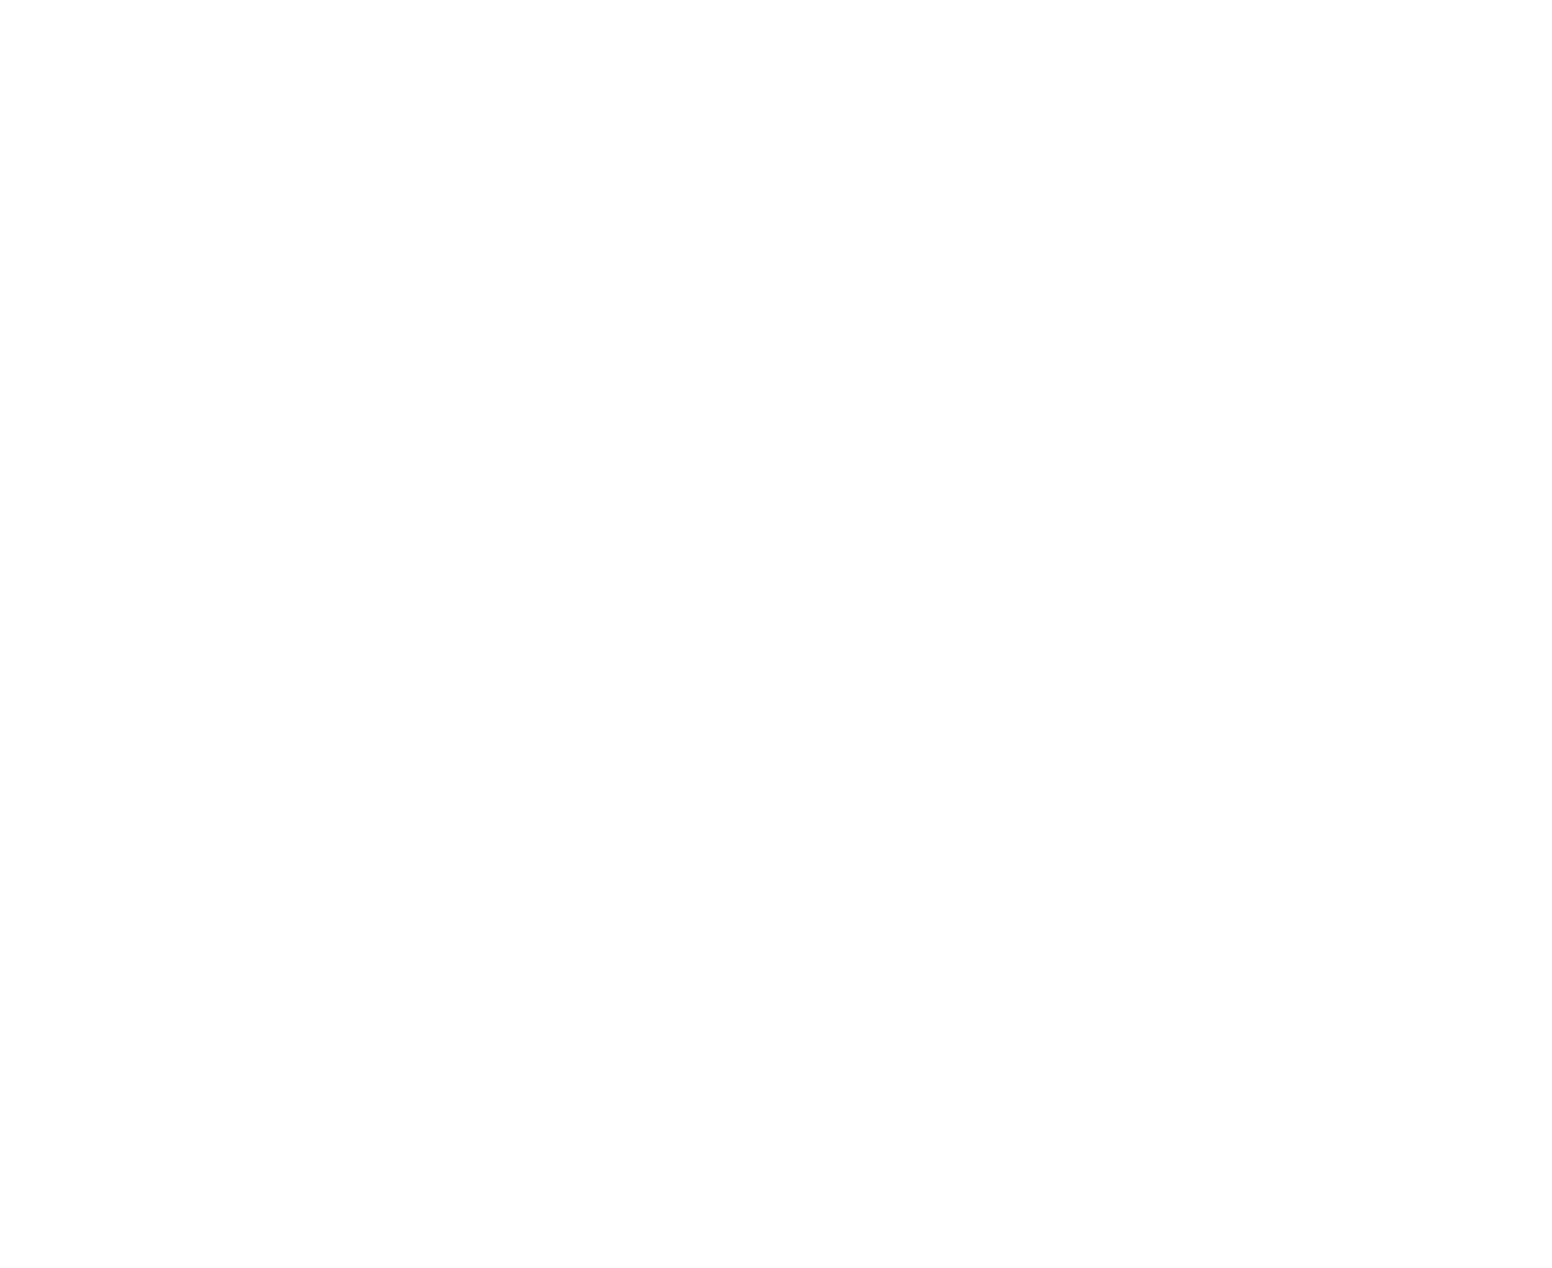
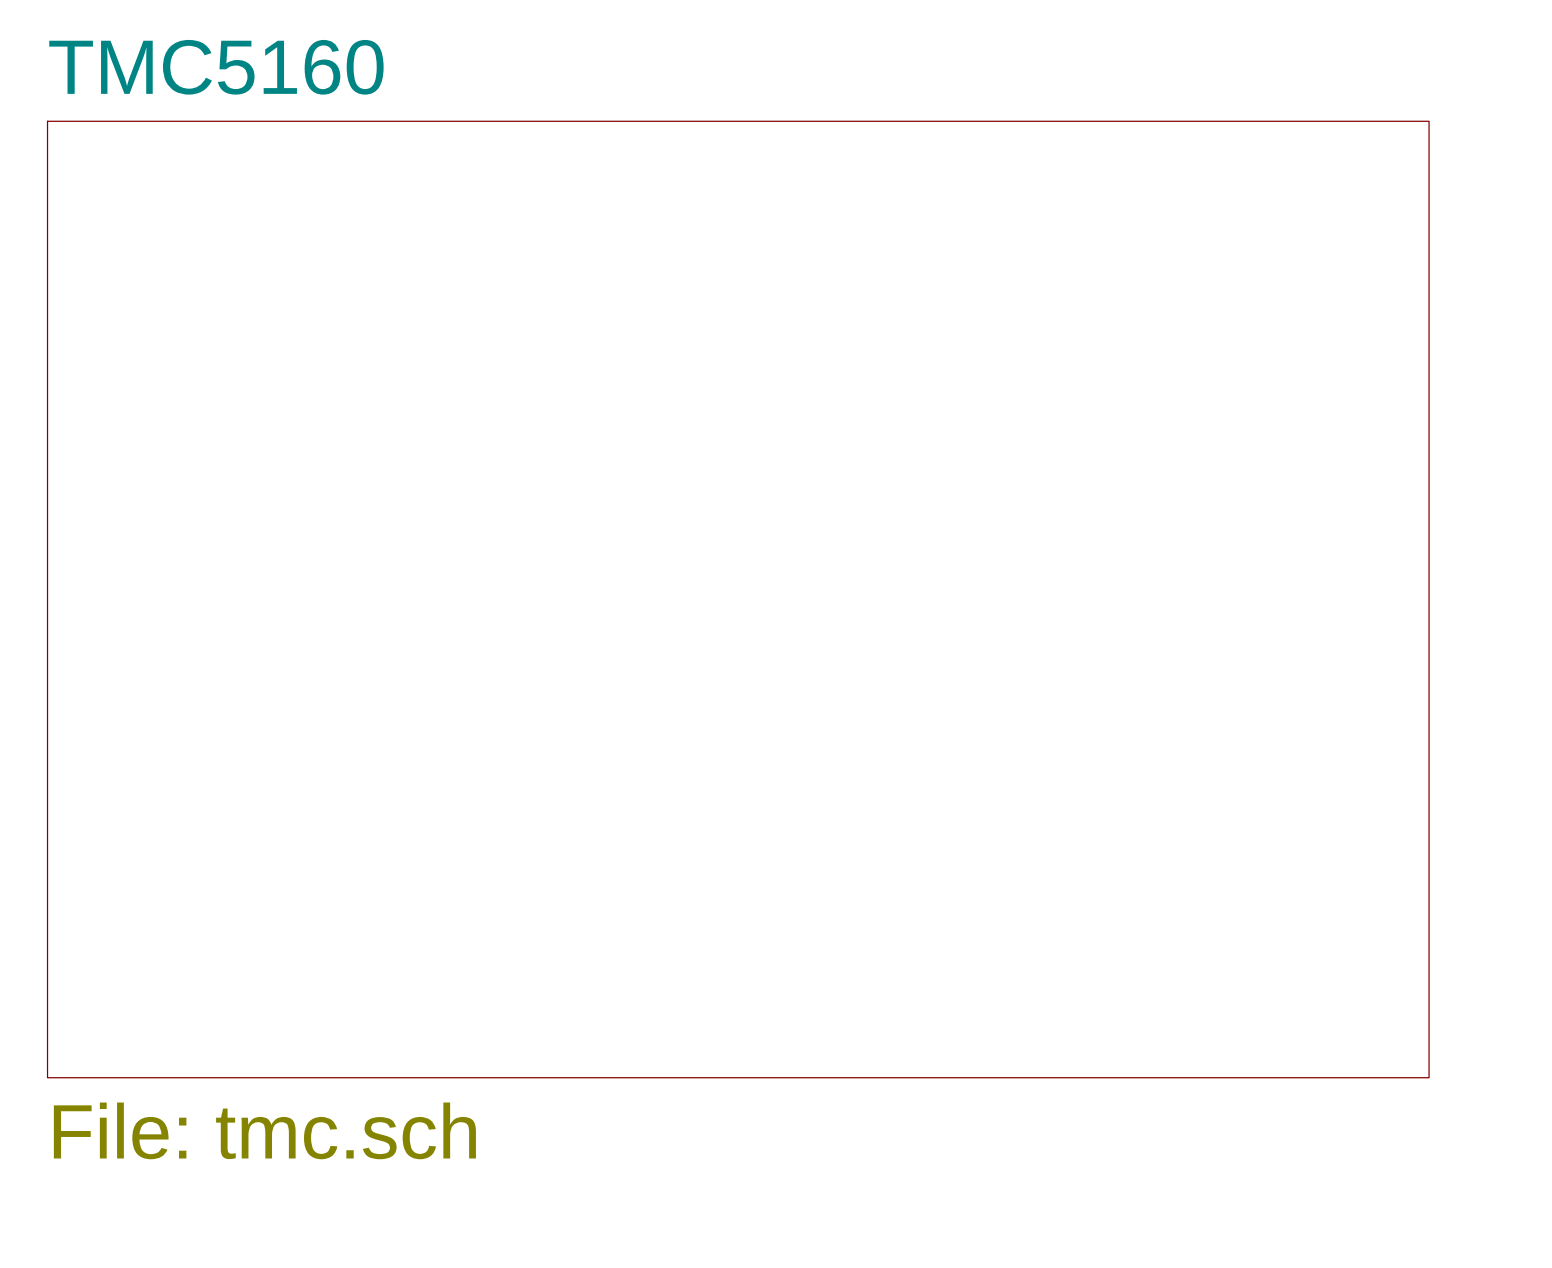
sheet TMC5160: none -> File: tmc.sch (738, 599)

